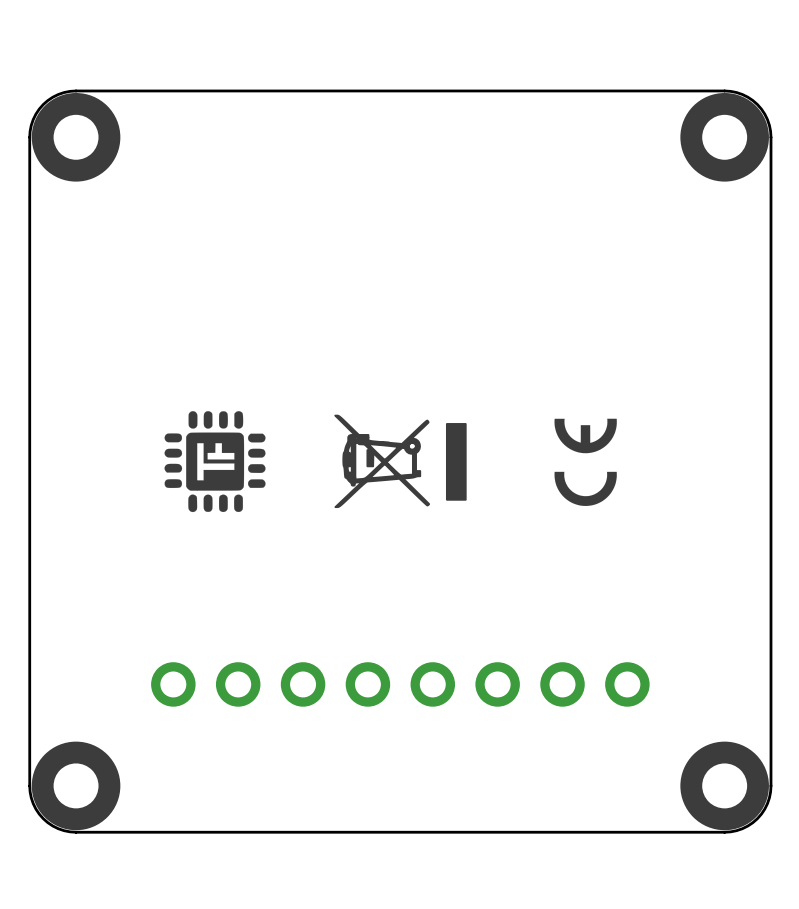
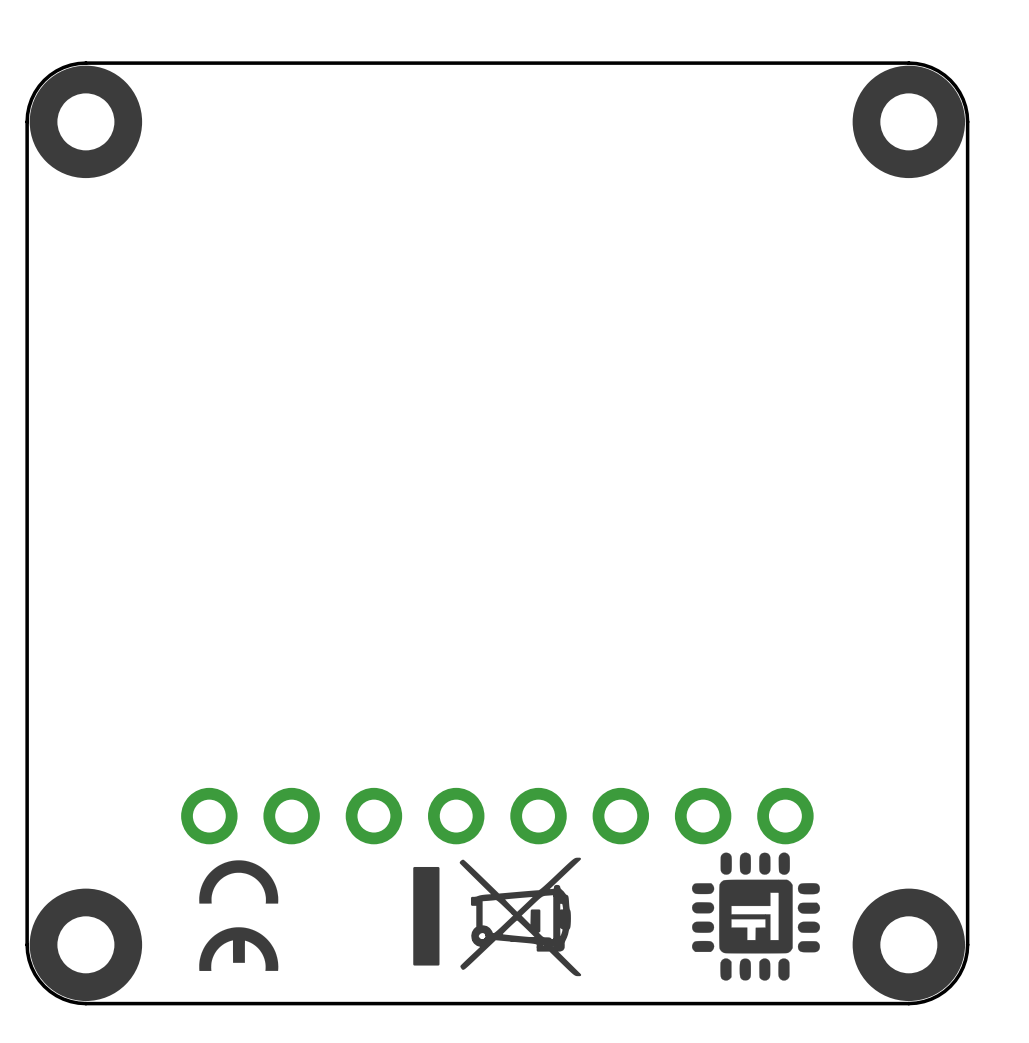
drawing: [164, 411, 266, 513] -> none
drawing: [334, 414, 467, 509] -> none
drawing: [554, 418, 617, 506] -> none
drawing: none -> [691, 852, 821, 981]
drawing: none -> [413, 857, 582, 977]
drawing: none -> [199, 860, 279, 971]

